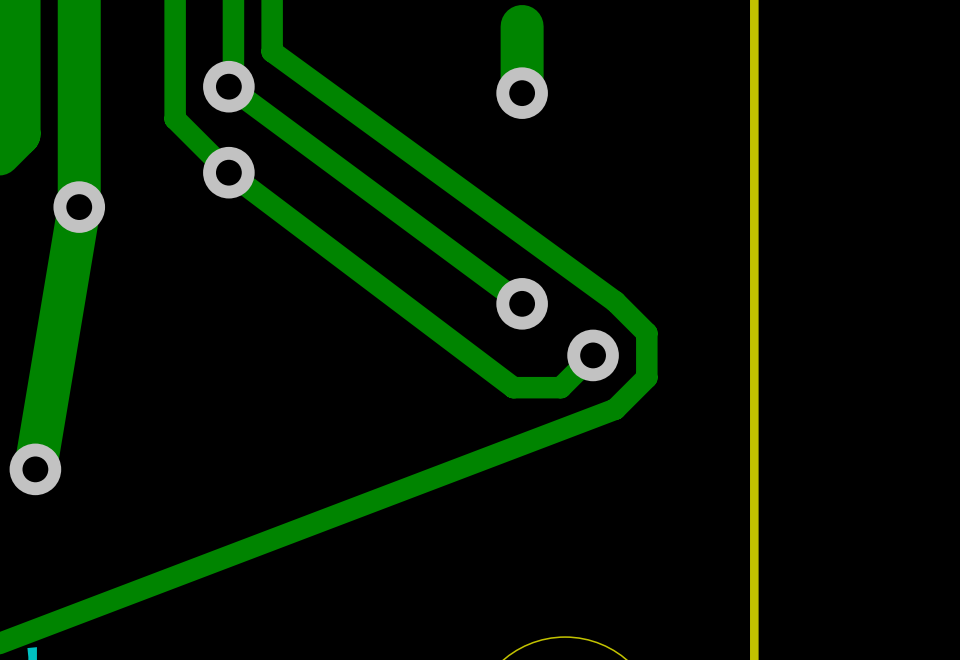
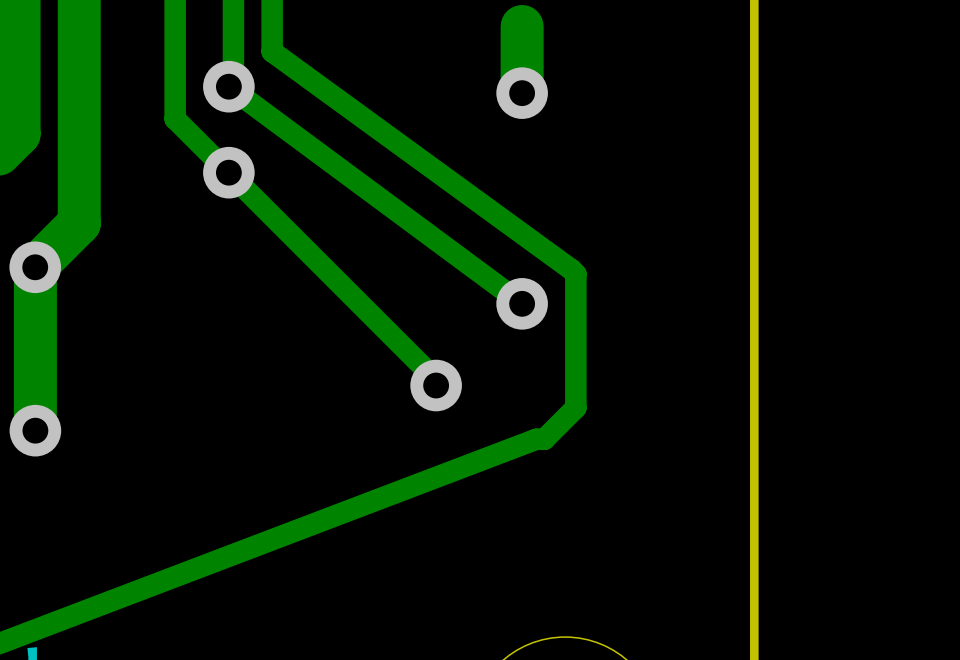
track: (272, 51) (615, 301) (646, 333) (646, 377) (615, 409) (536, 439) -> (272, 51) (575, 274) (575, 407) (544, 439) (536, 439)
track: (228, 172) (513, 387) (560, 387) (593, 355) -> (228, 172) (436, 379) (436, 385)
track: (79, 207) (35, 469) -> (79, 207) (79, 223) (35, 267) (35, 430)
via position: (79, 207) -> (35, 267)
via position: (593, 355) -> (436, 385)
via position: (35, 469) -> (35, 430)

